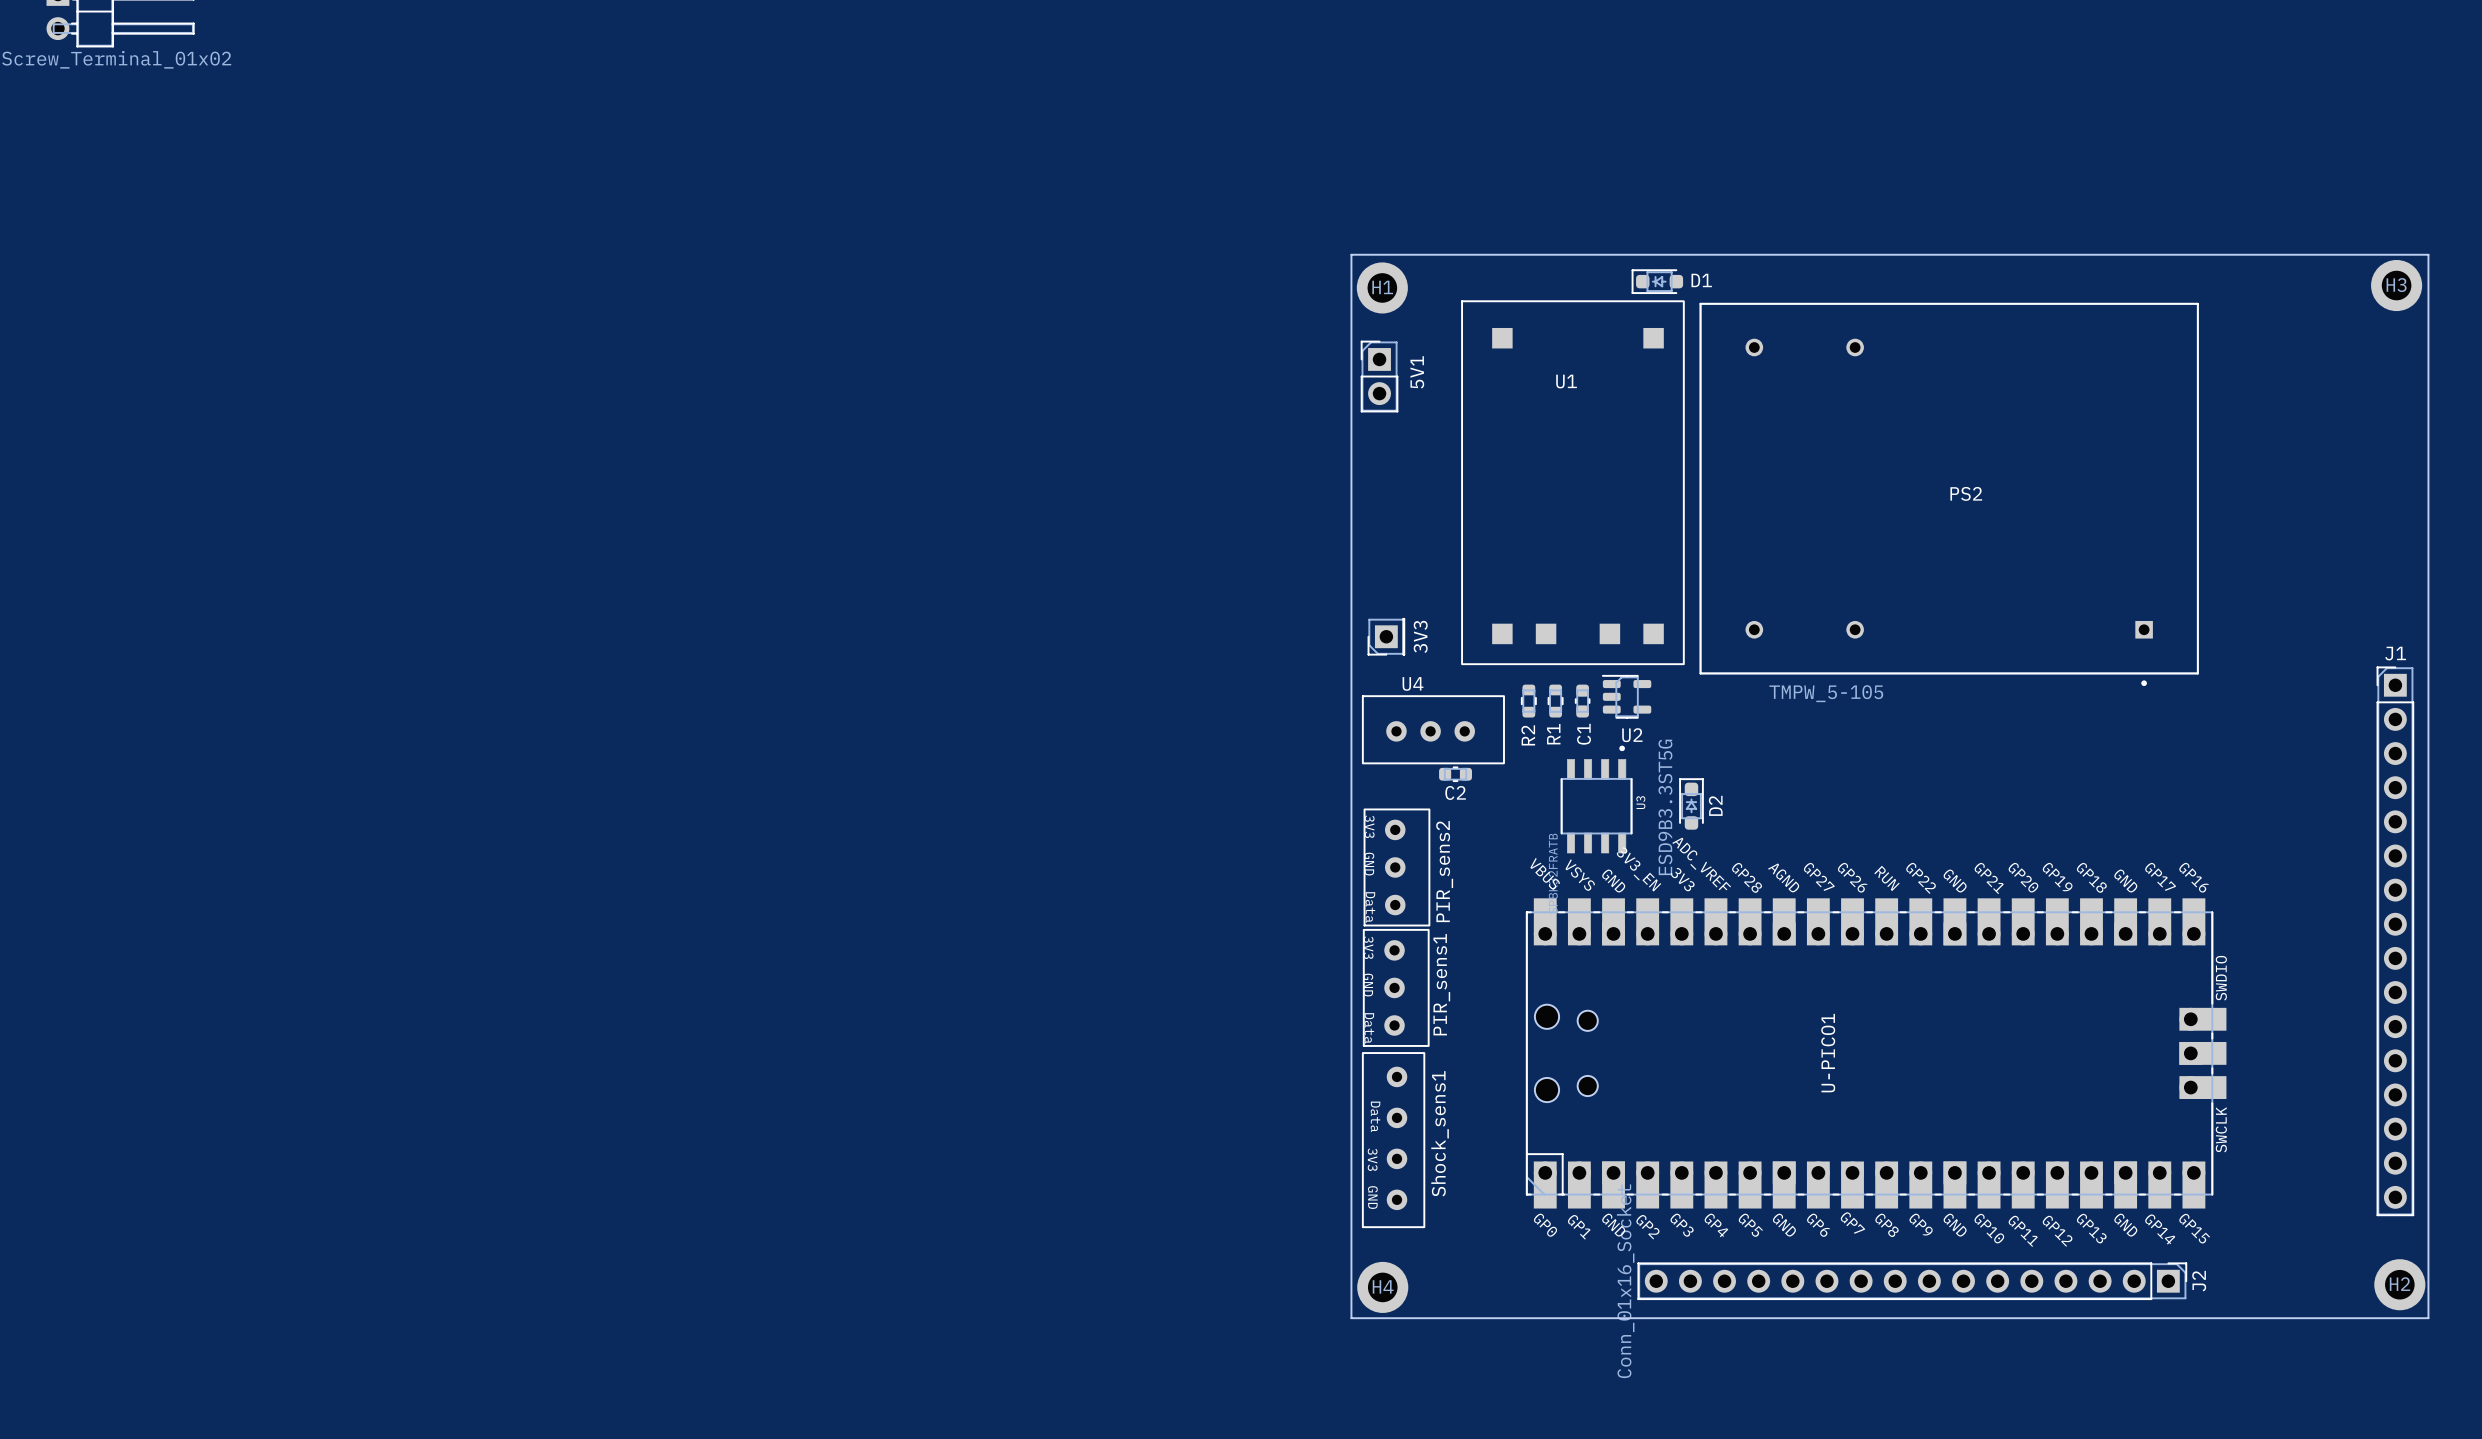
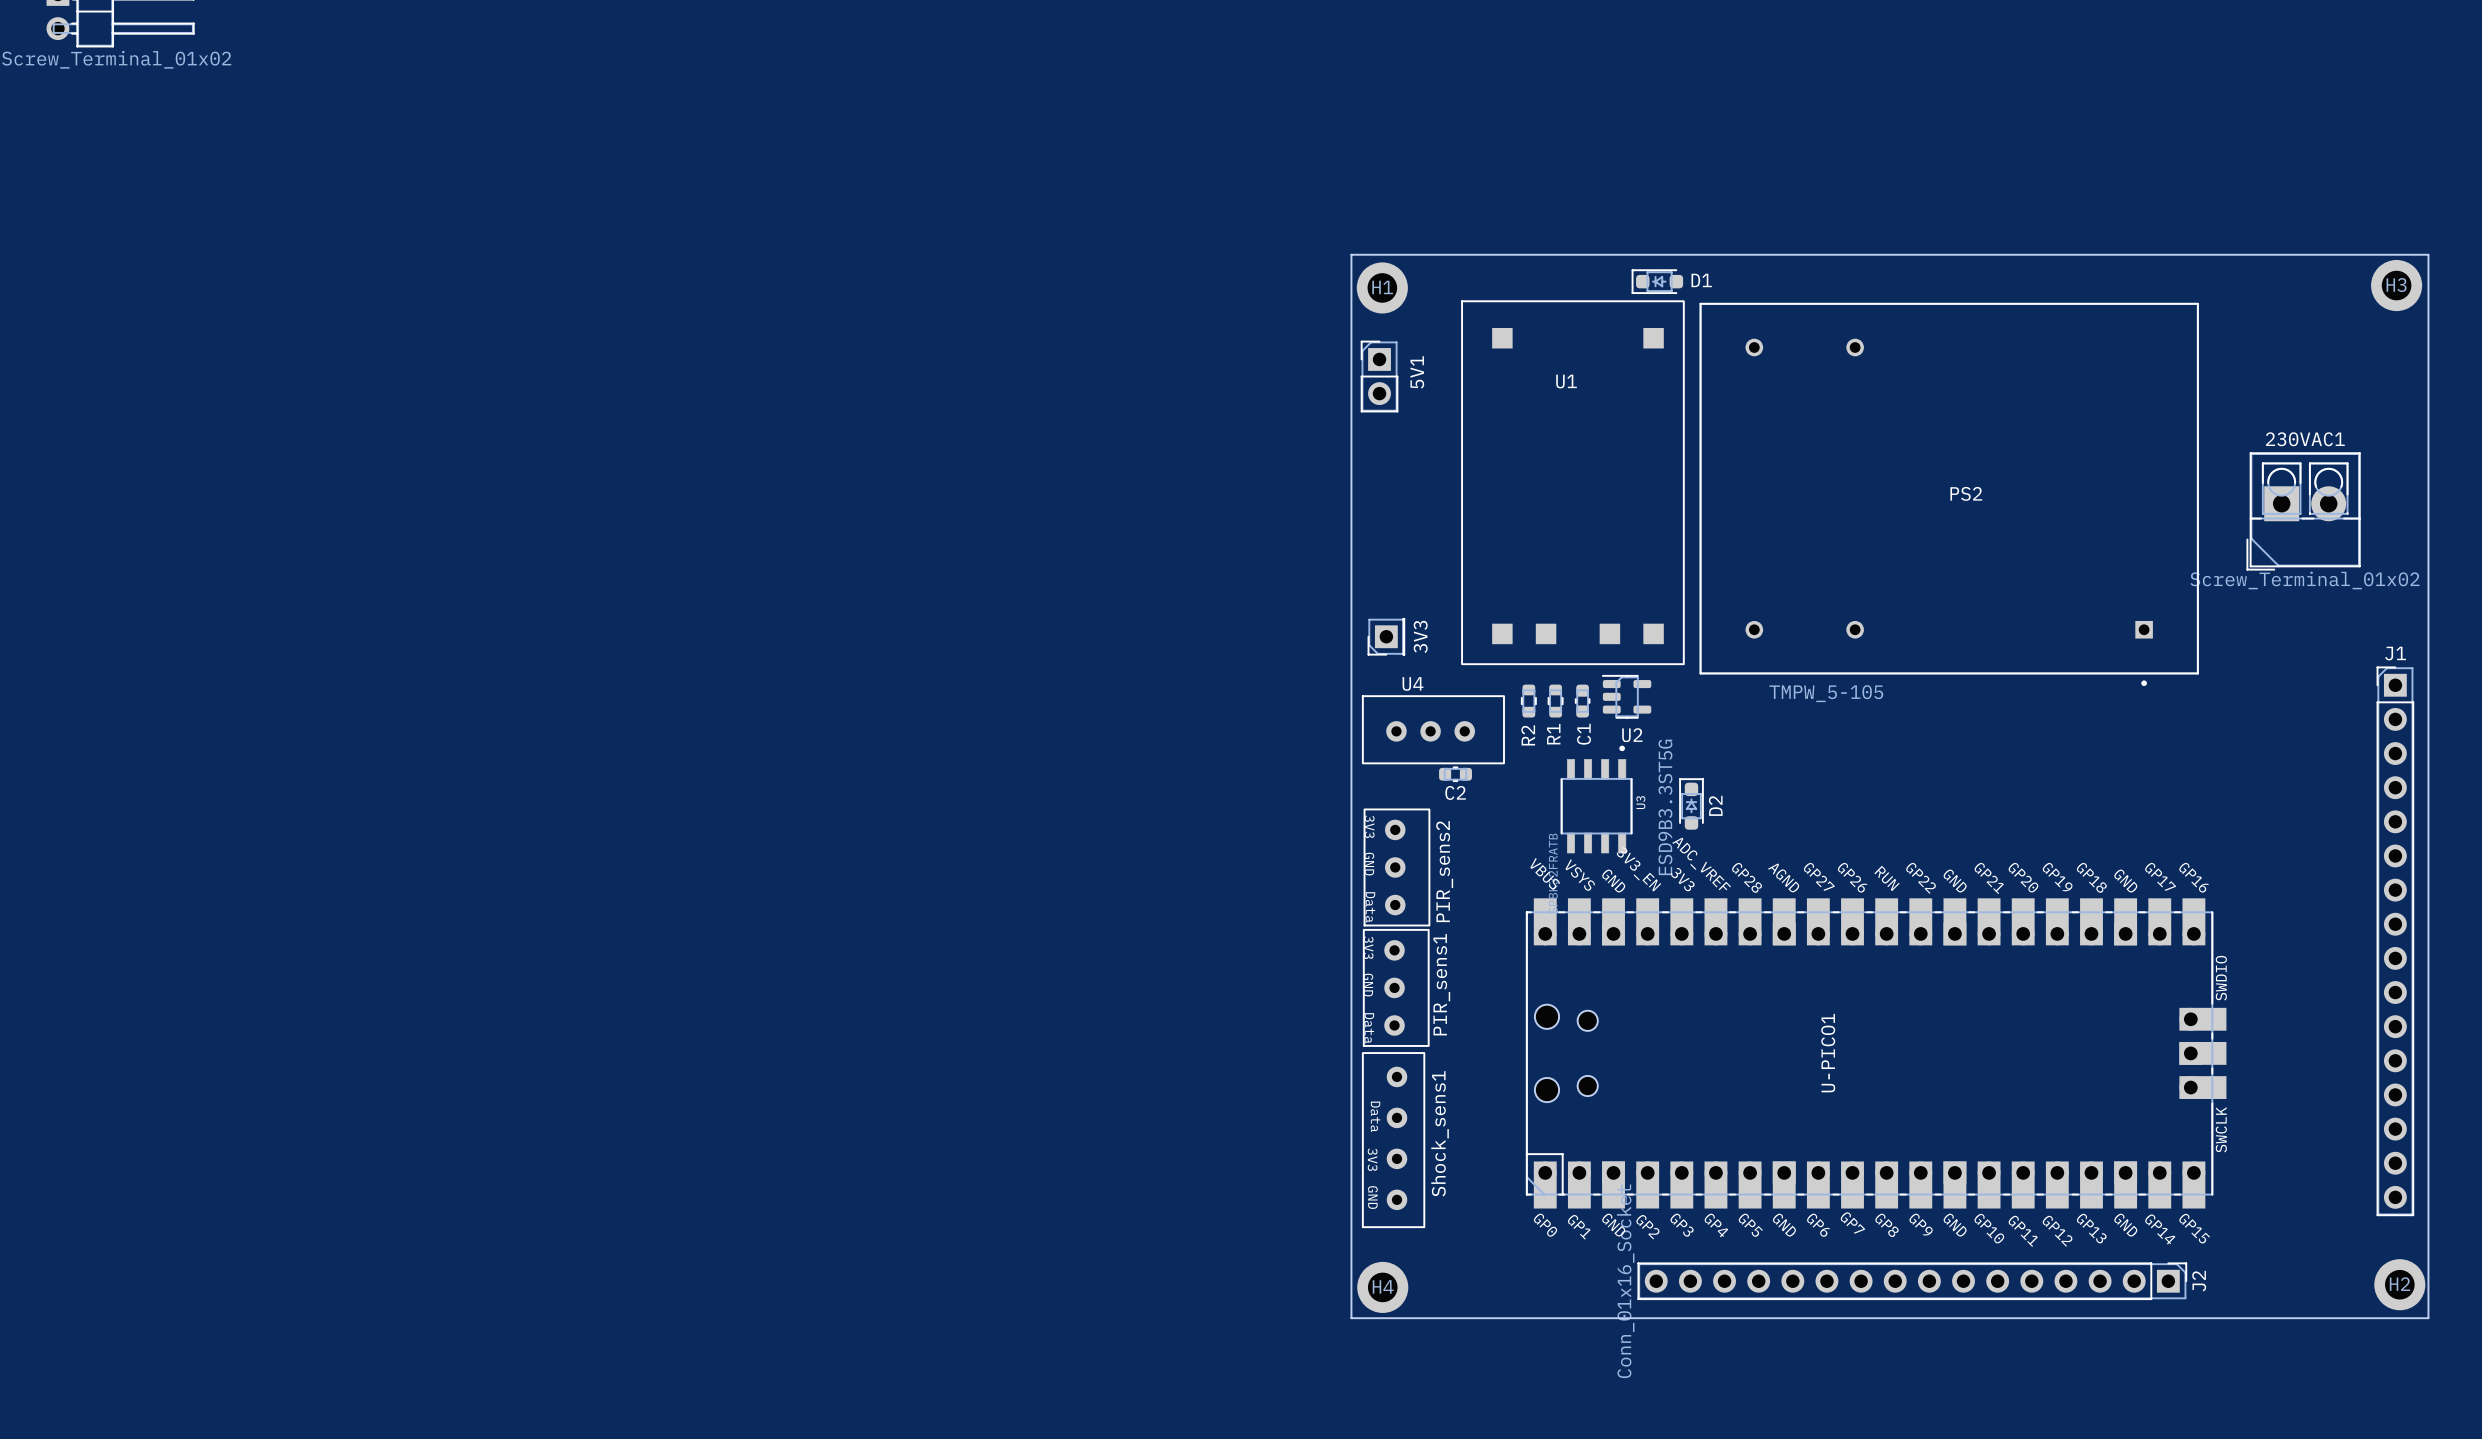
230VAC1: none -> Screw_Terminal_01x02 (2303, 511)

